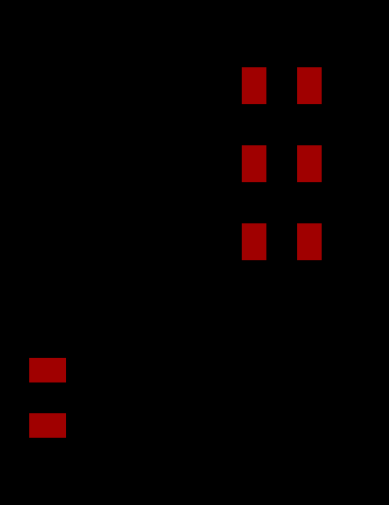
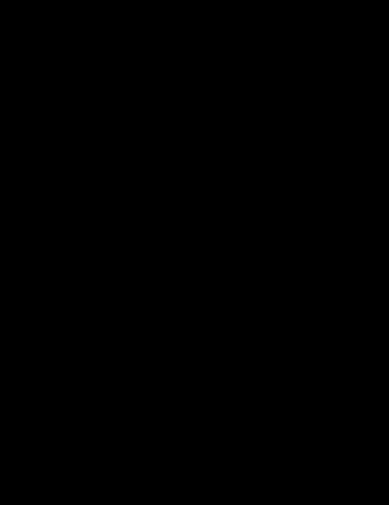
part: (281, 85) -> none
part: (281, 163) -> none
part: (281, 241) -> none
part: (47, 397) -> none

